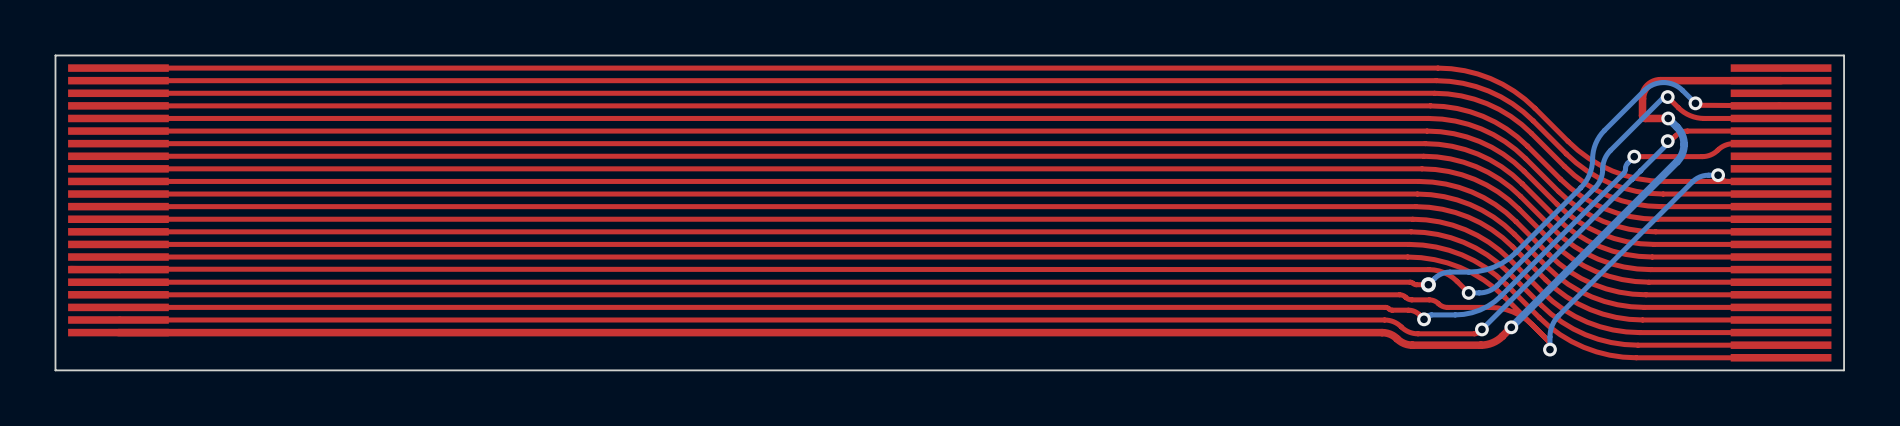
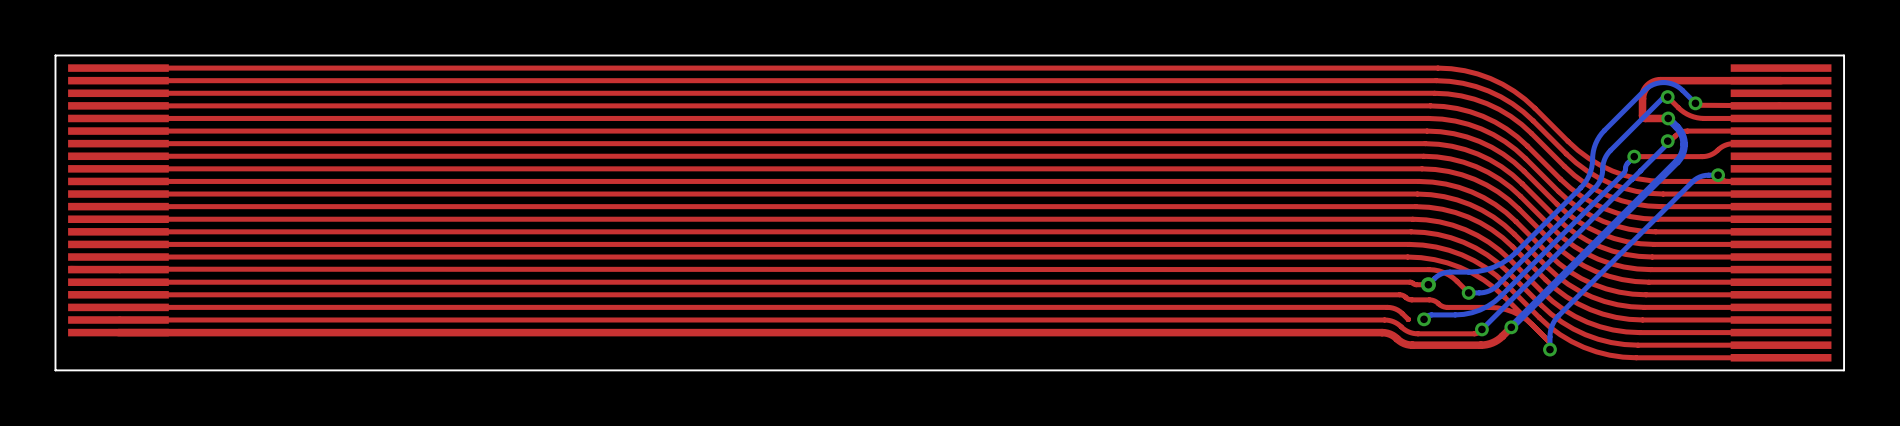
top track: (1385, 307) (1391, 310) (1412, 310) (1424, 319) -> (1385, 307) (1397, 310) (1408, 319)

